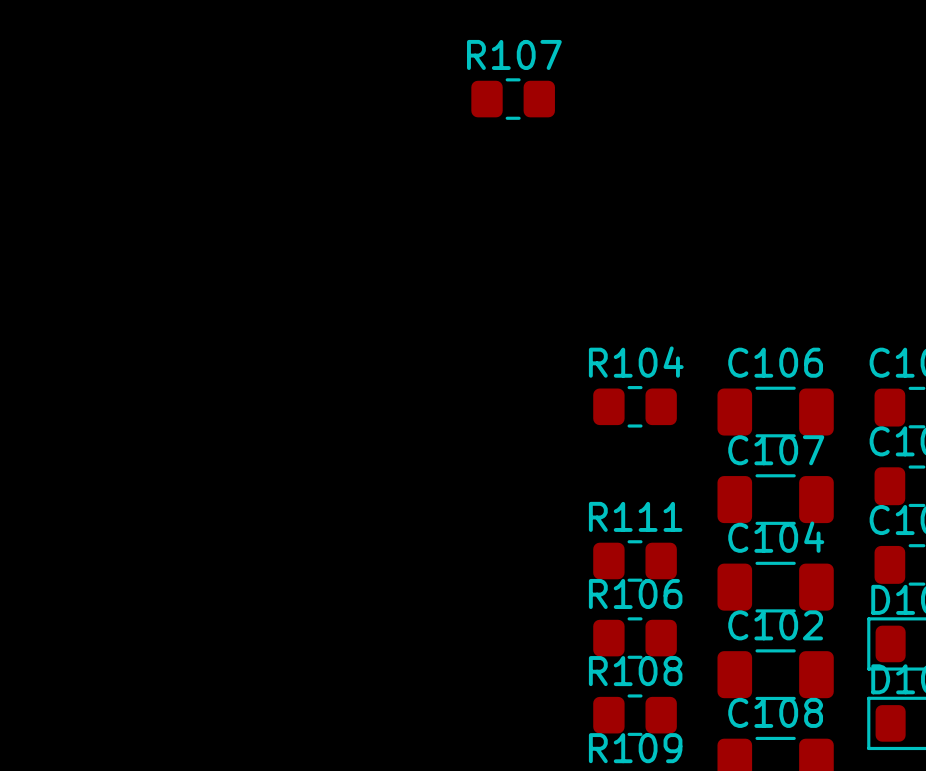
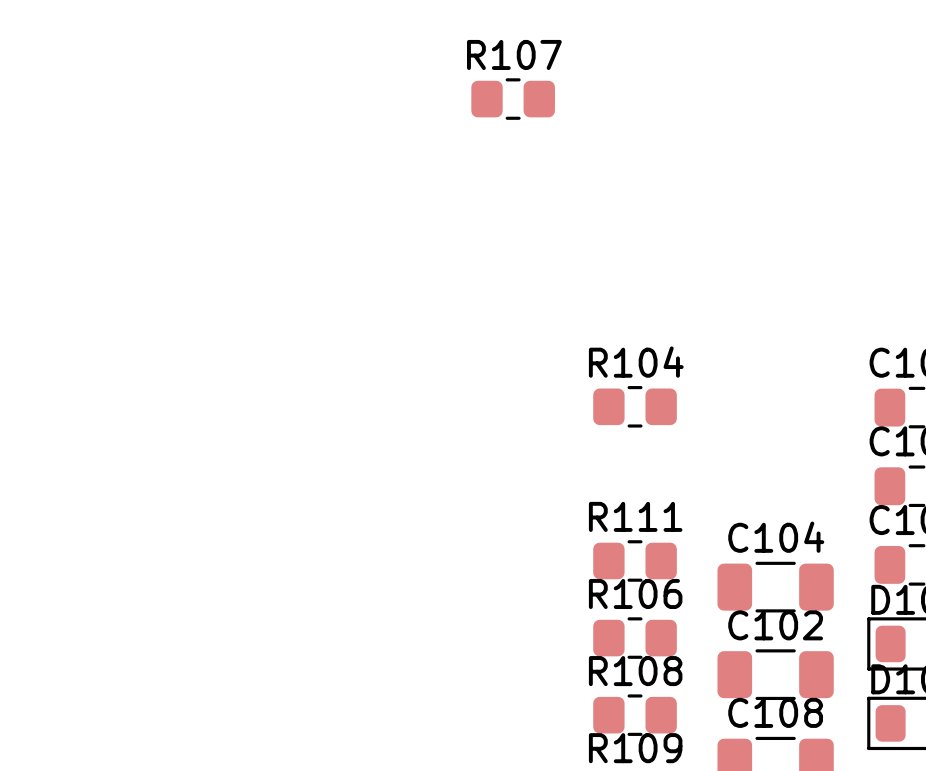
C106: (775, 412) -> none
C107: (775, 499) -> none

